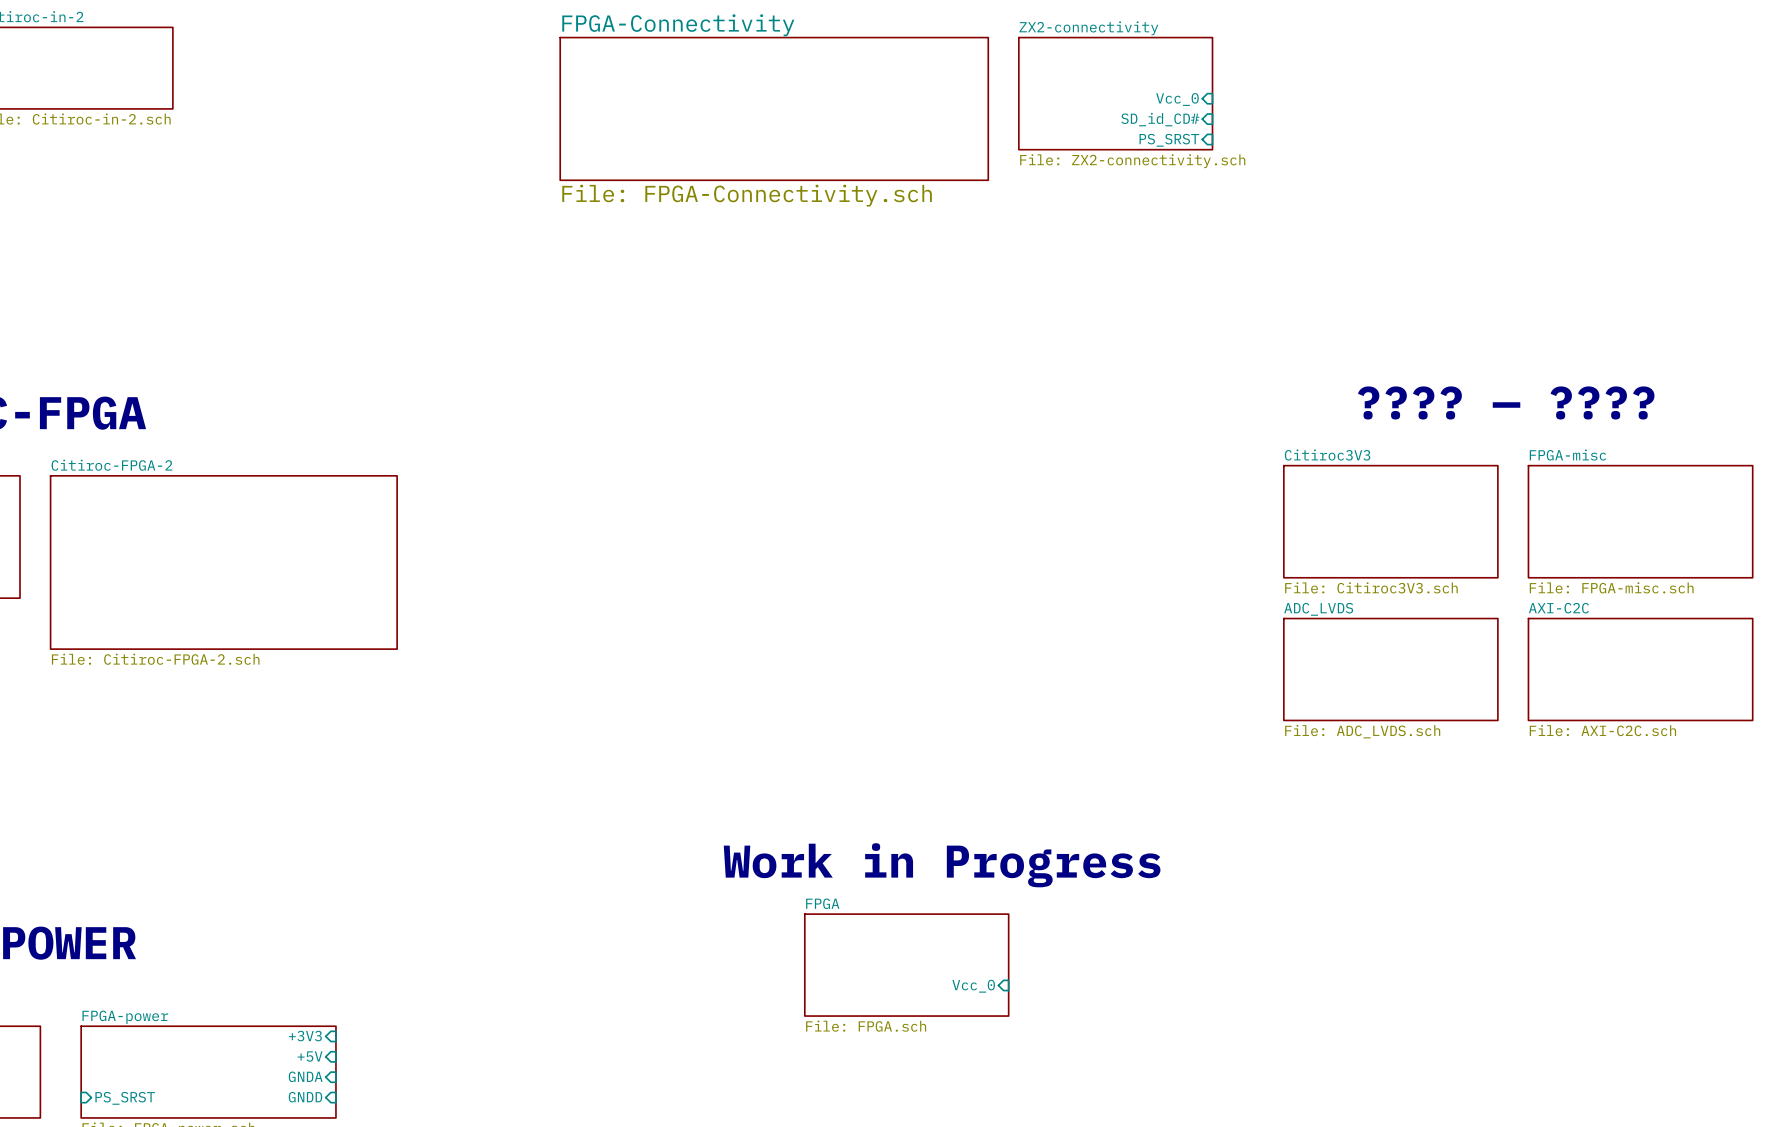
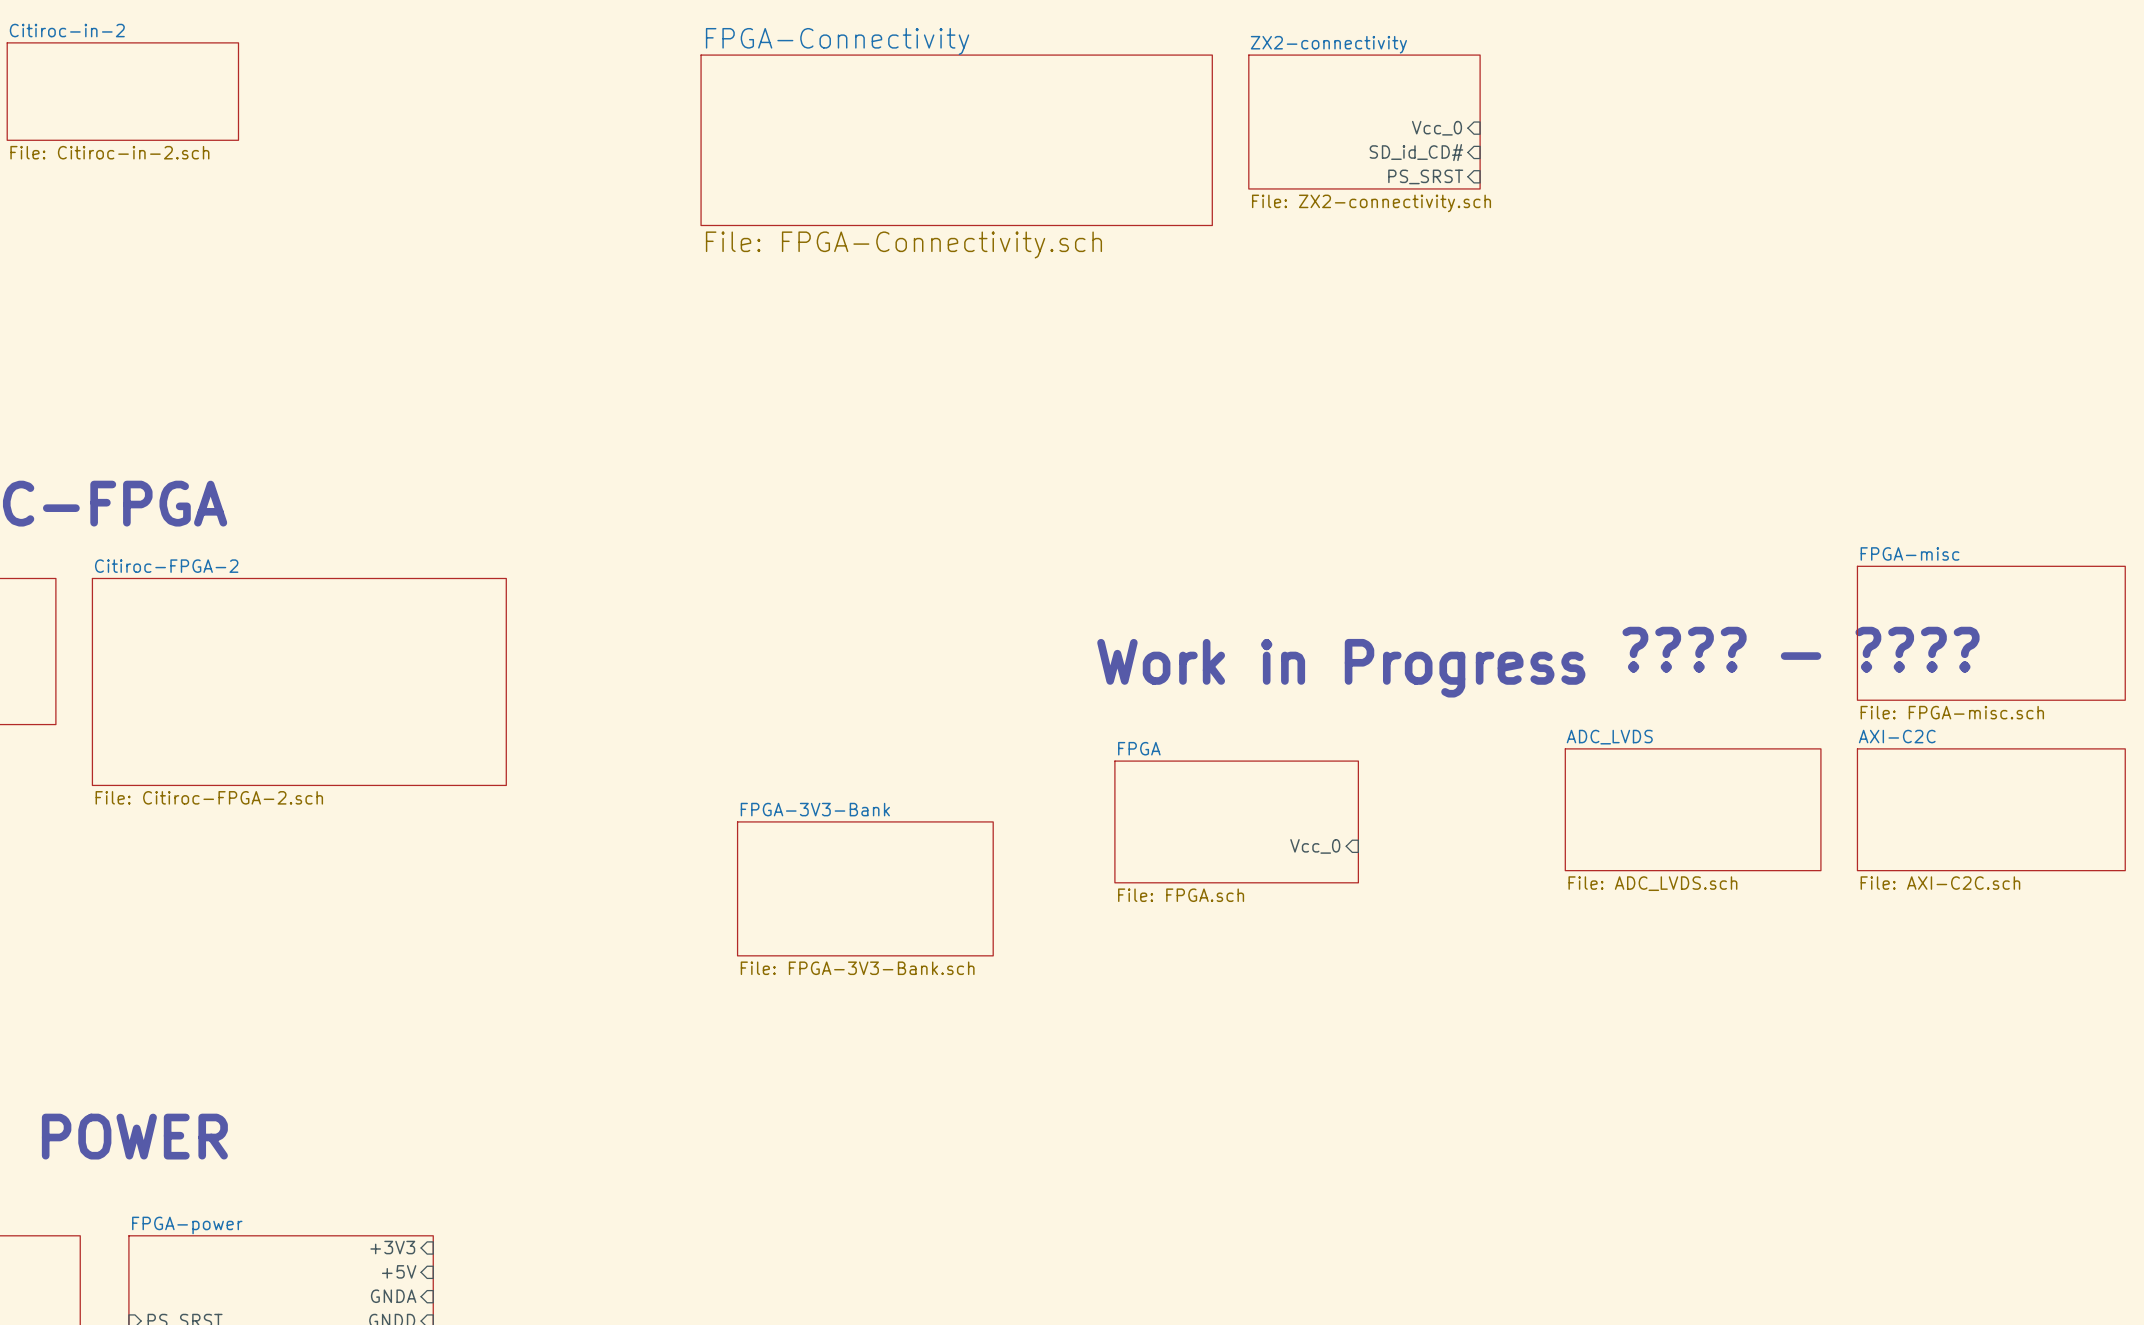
text position: ???? — ???? (1506, 402) -> ???? — ???? (1801, 649)
sheet Citiroc3V3: File: Citiroc3V3.sch (1390, 521) -> none
text: none -> Work in Progress (1341, 668)
sheet FPGA: none -> File: FPGA.sch (1236, 821)
sheet pin: none -> Vcc_0 (1315, 846)
sheet FPGA-3V3-Bank: none -> File: FPGA-3V3-Bank.sch (865, 888)
text: Work in Progress (942, 865) -> none
sheet FPGA: File: FPGA.sch (906, 965) -> none
sheet pin: Vcc_0 (973, 986) -> none

